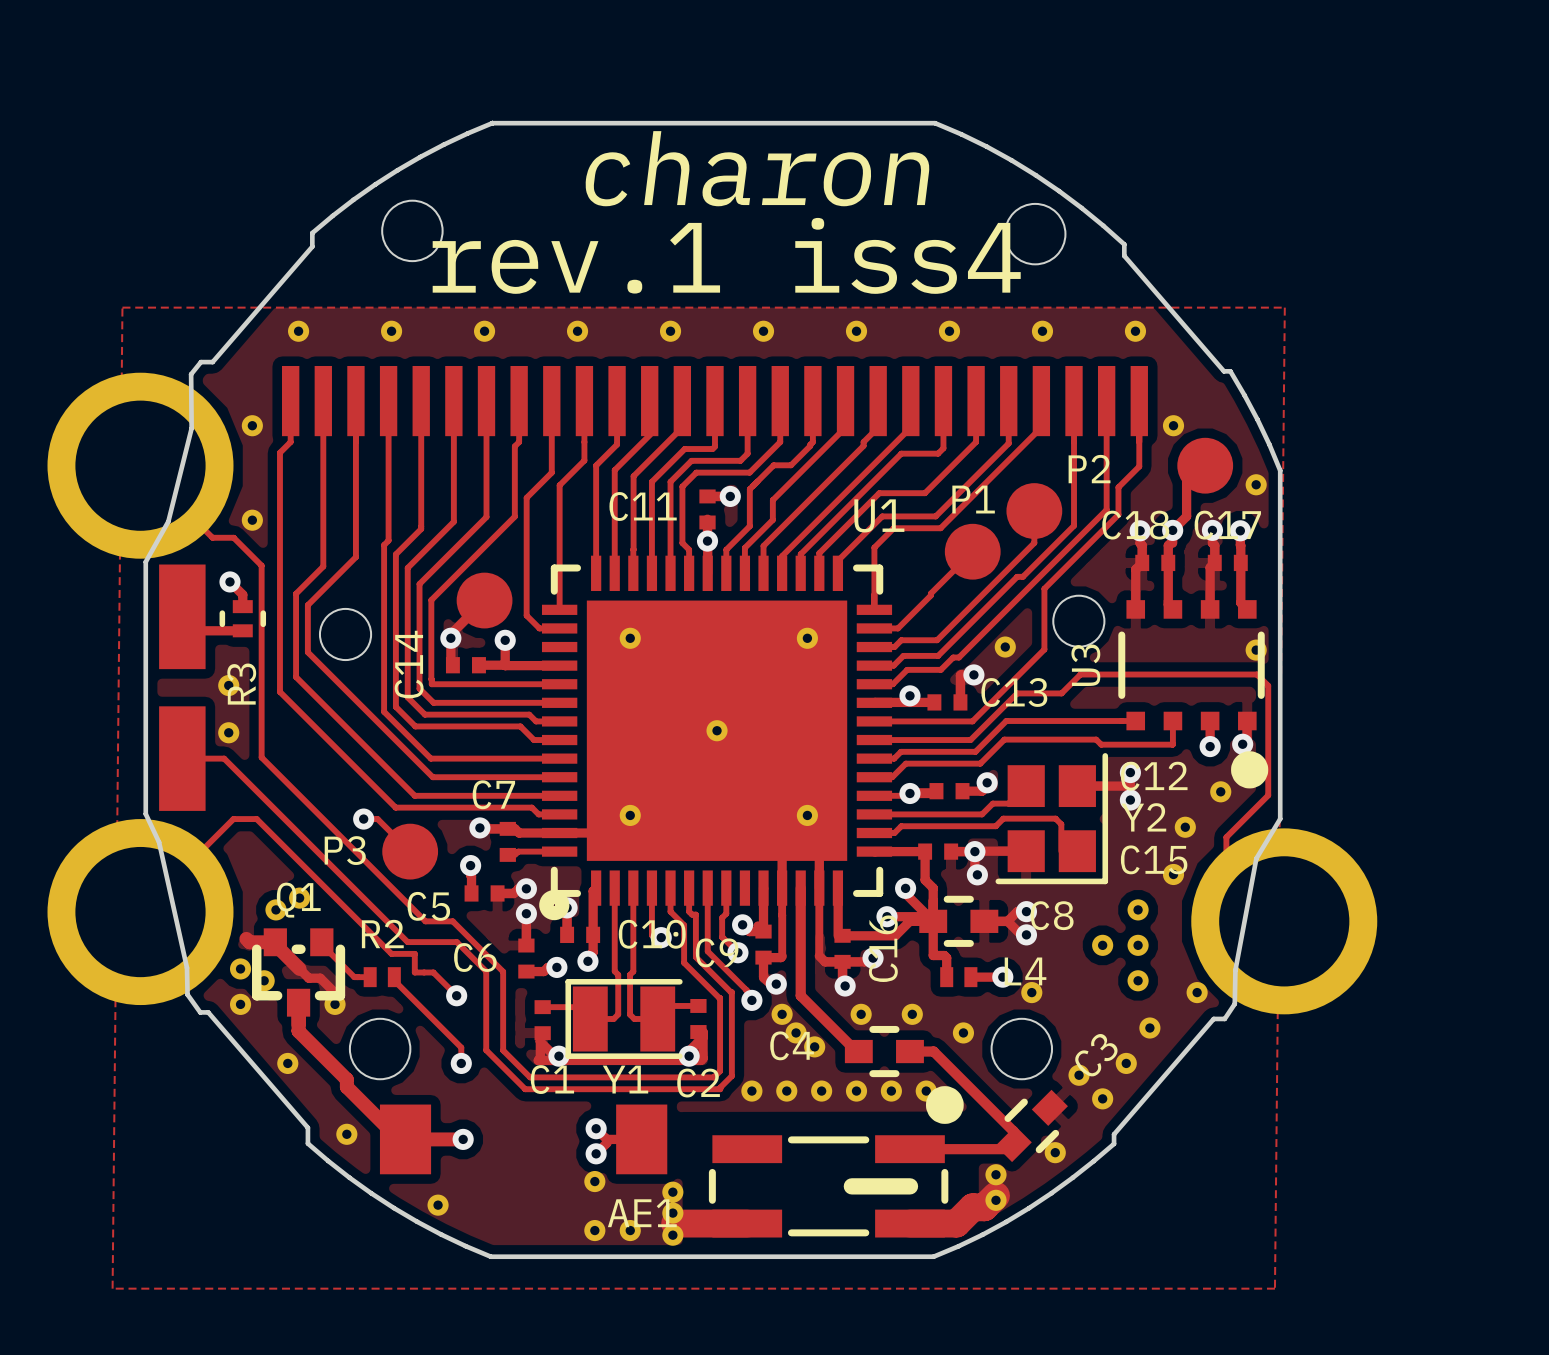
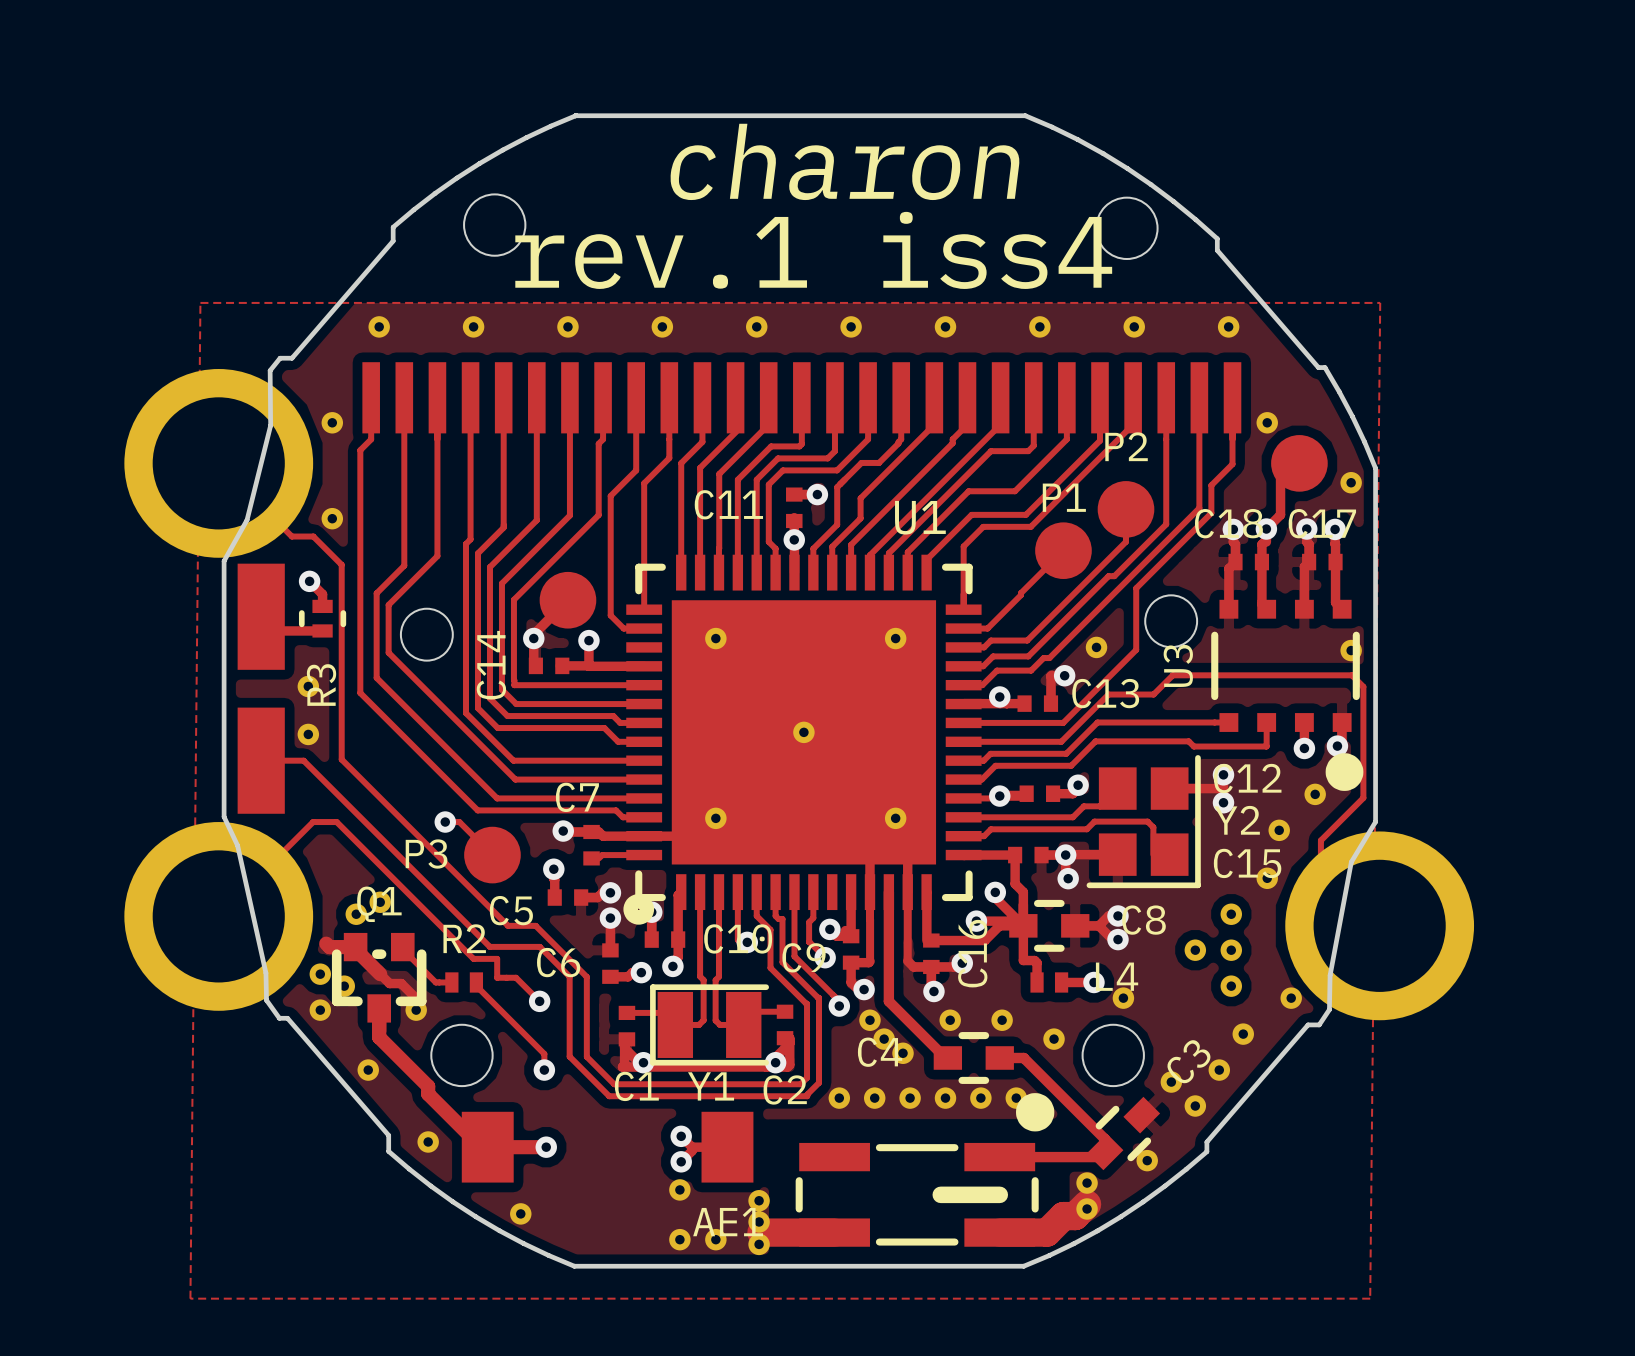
P2 name position: P2 (1089, 469) -> P2 (1126, 446)
U1 footprint: [539, 555, 893, 921] -> [623, 554, 982, 925]

